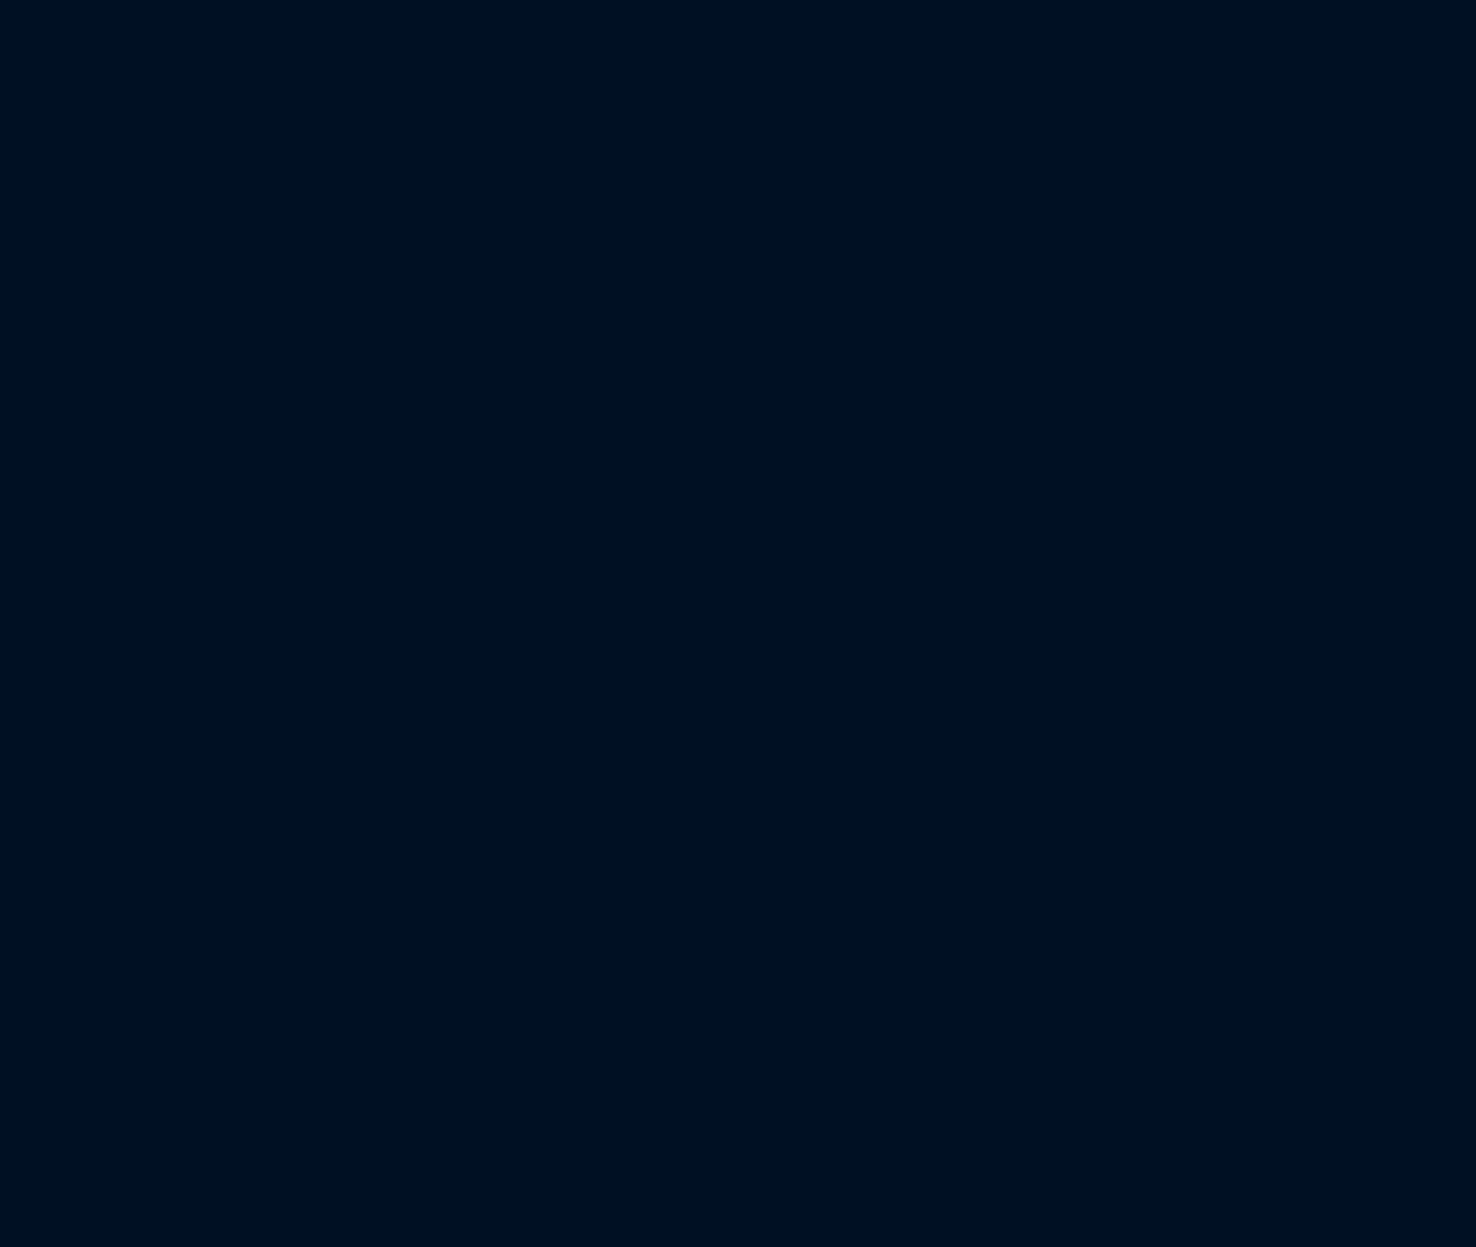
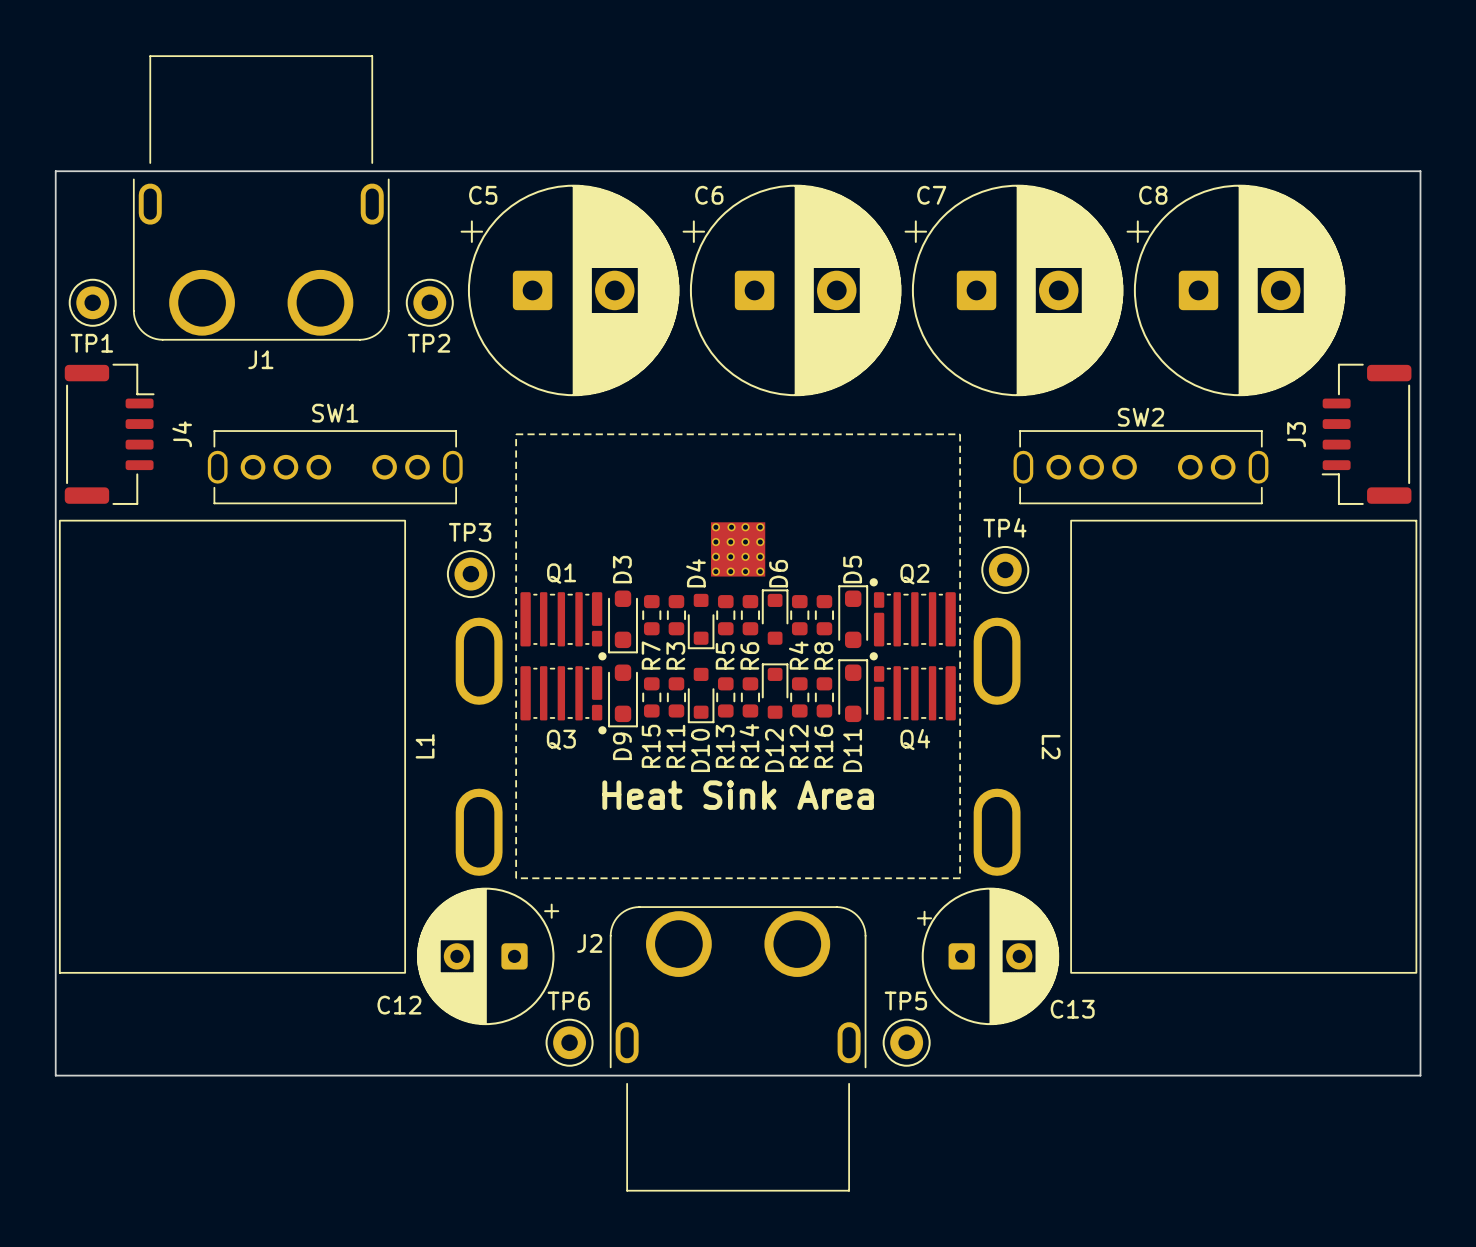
board edge: none -> (55, 171) (1420, 171) (1420, 1075) (55, 1075) (55, 171)
J1: none -> (261, 197)
C5: none -> (570, 290)
C6: none -> (791, 290)
C7: none -> (1013, 290)
C8: none -> (1235, 290)
TP1: none -> (92, 302)
TP2: none -> (429, 302)
J4: none -> (109, 434)
line: none -> (516, 434) (960, 434) (960, 878) (516, 878) (516, 434)
J3: none -> (1366, 434)
SW1: none -> (335, 467)
SW2: none -> (1140, 467)
part: none -> (738, 549)
TP4: none -> (1005, 569)
TP3: none -> (470, 574)
Q2: none -> (912, 612)
R7: none -> (651, 615)
R3: none -> (676, 615)
R5: none -> (725, 615)
R6: none -> (750, 615)
R4: none -> (799, 615)
R8: none -> (824, 615)
D5: none -> (853, 616)
D6: none -> (775, 617)
D3: none -> (623, 621)
D4: none -> (701, 621)
Q1: none -> (563, 626)
Q4: none -> (912, 686)
D11: none -> (853, 690)
D12: none -> (775, 691)
D9: none -> (623, 695)
D10: none -> (701, 695)
R15: none -> (651, 697)
R11: none -> (676, 697)
R13: none -> (725, 697)
R14: none -> (750, 697)
R12: none -> (799, 697)
R16: none -> (824, 697)
Q3: none -> (563, 700)
L1: none -> (280, 746)
L2: none -> (1195, 746)
text: none -> Heat Sink Area (738, 795)
C12: none -> (488, 956)
C13: none -> (988, 956)
TP6: none -> (569, 1042)
TP5: none -> (906, 1042)
J2: none -> (738, 1048)

